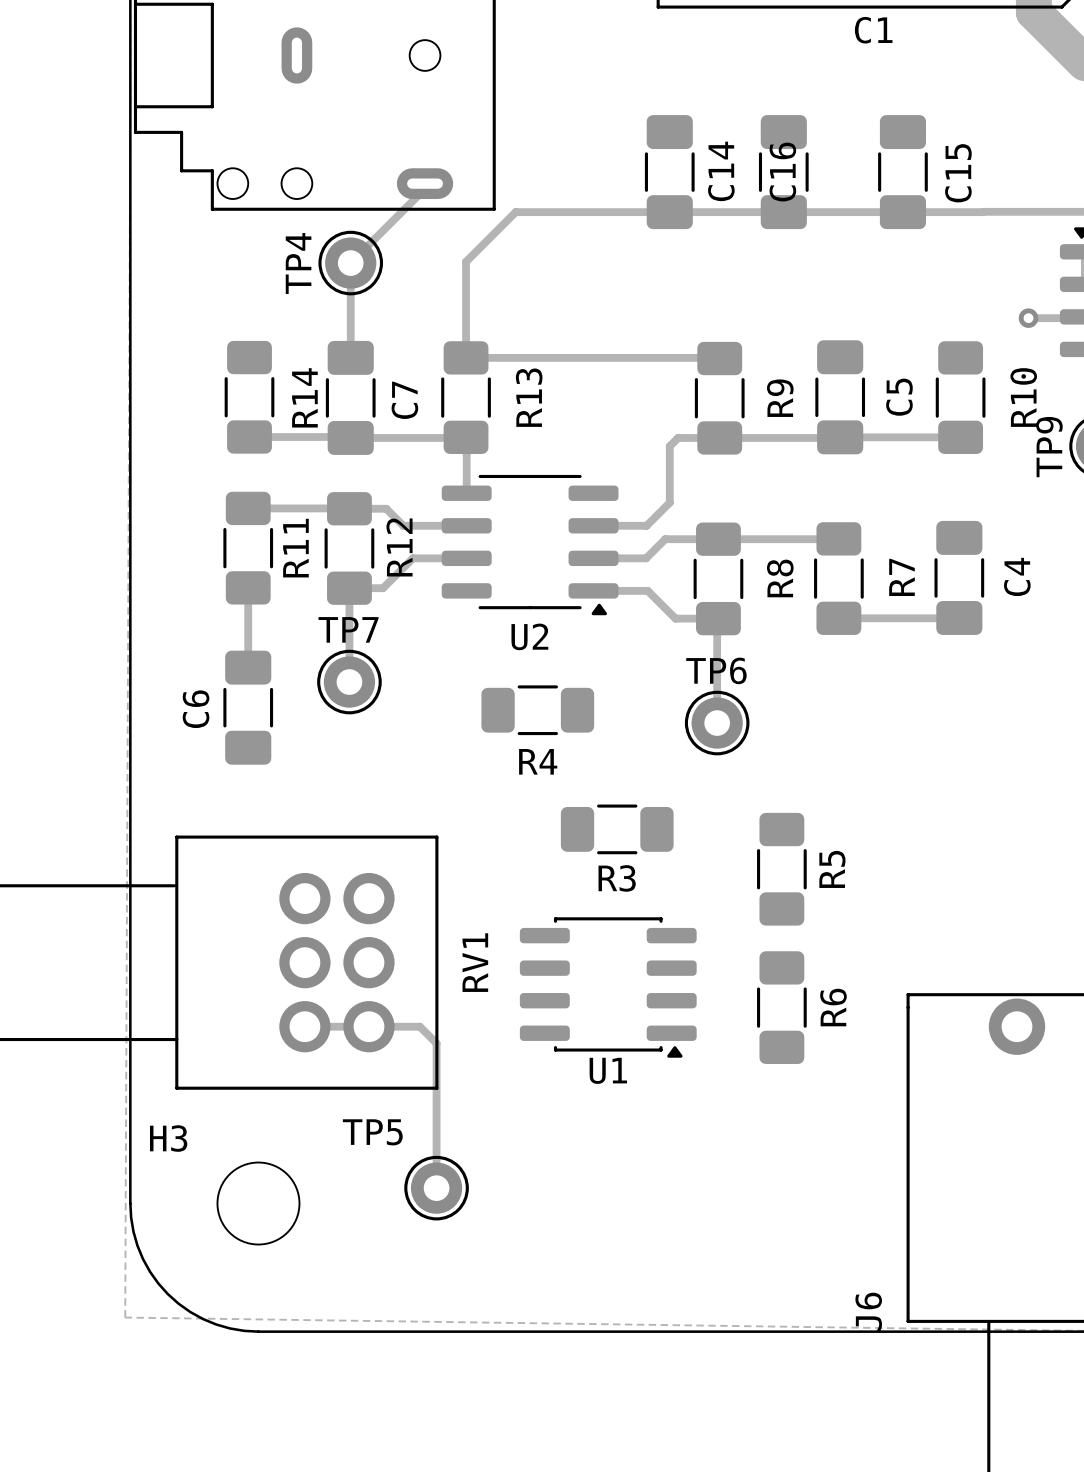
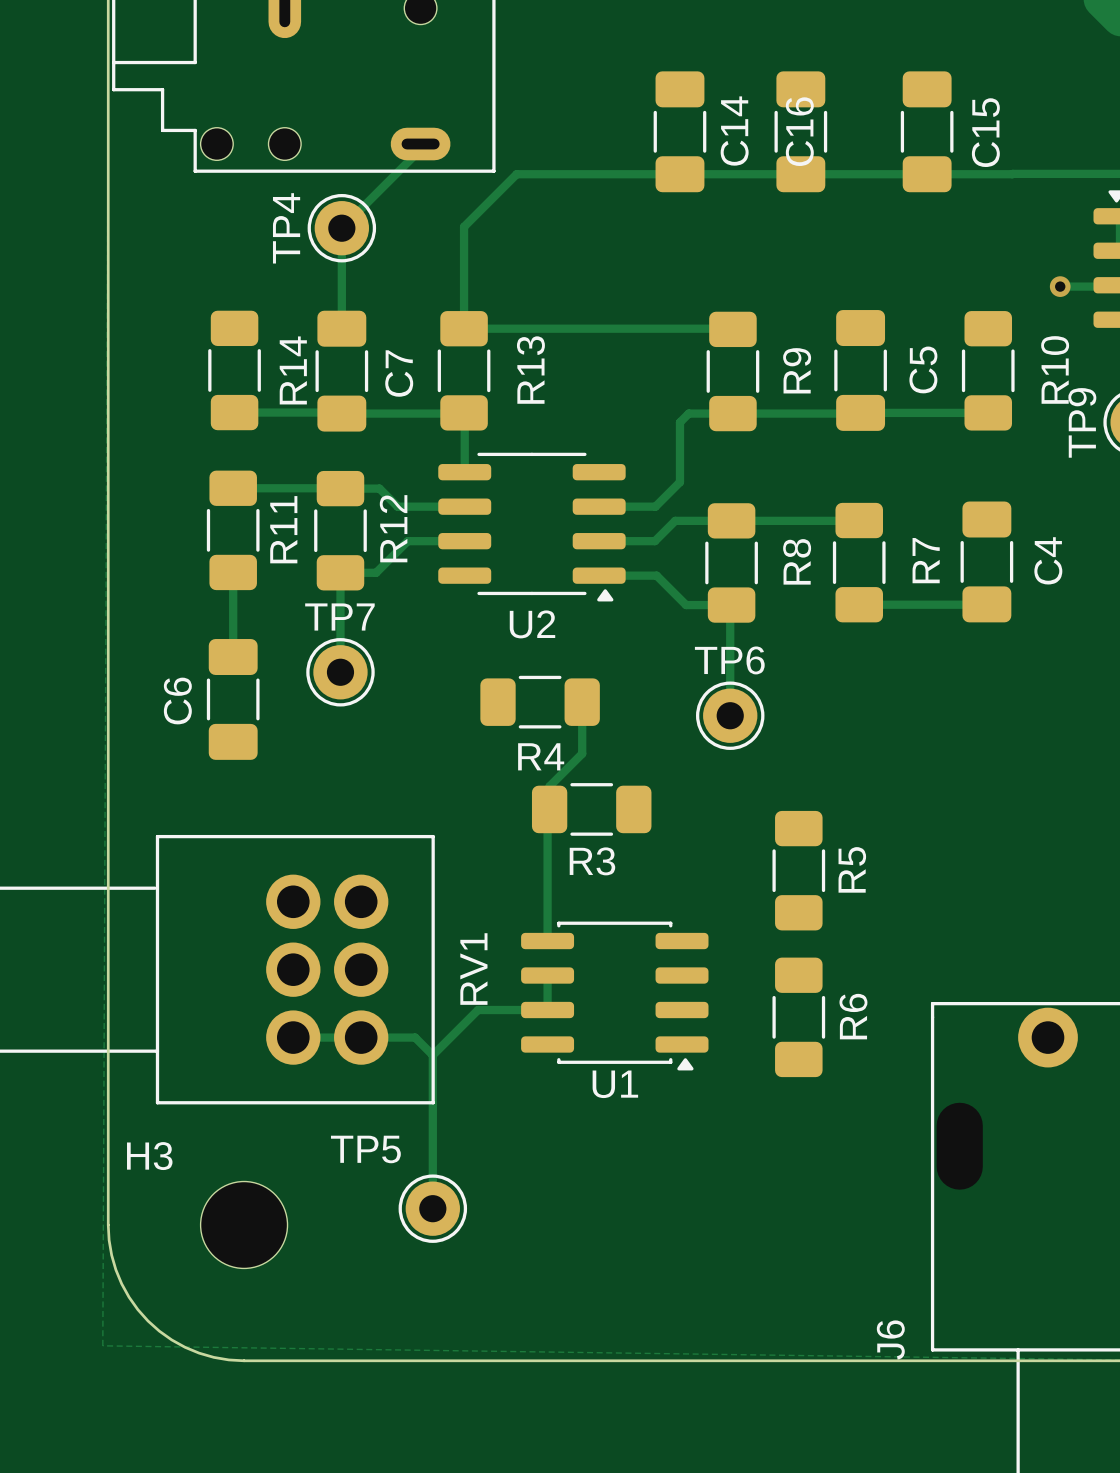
track: none -> (582, 702) (582, 753) (549, 786) (549, 809) (547, 811) (547, 941)
R3 position: (617, 829) -> (591, 809)
track: none -> (547, 975) (547, 1010) (478, 1010) (432, 1055)

